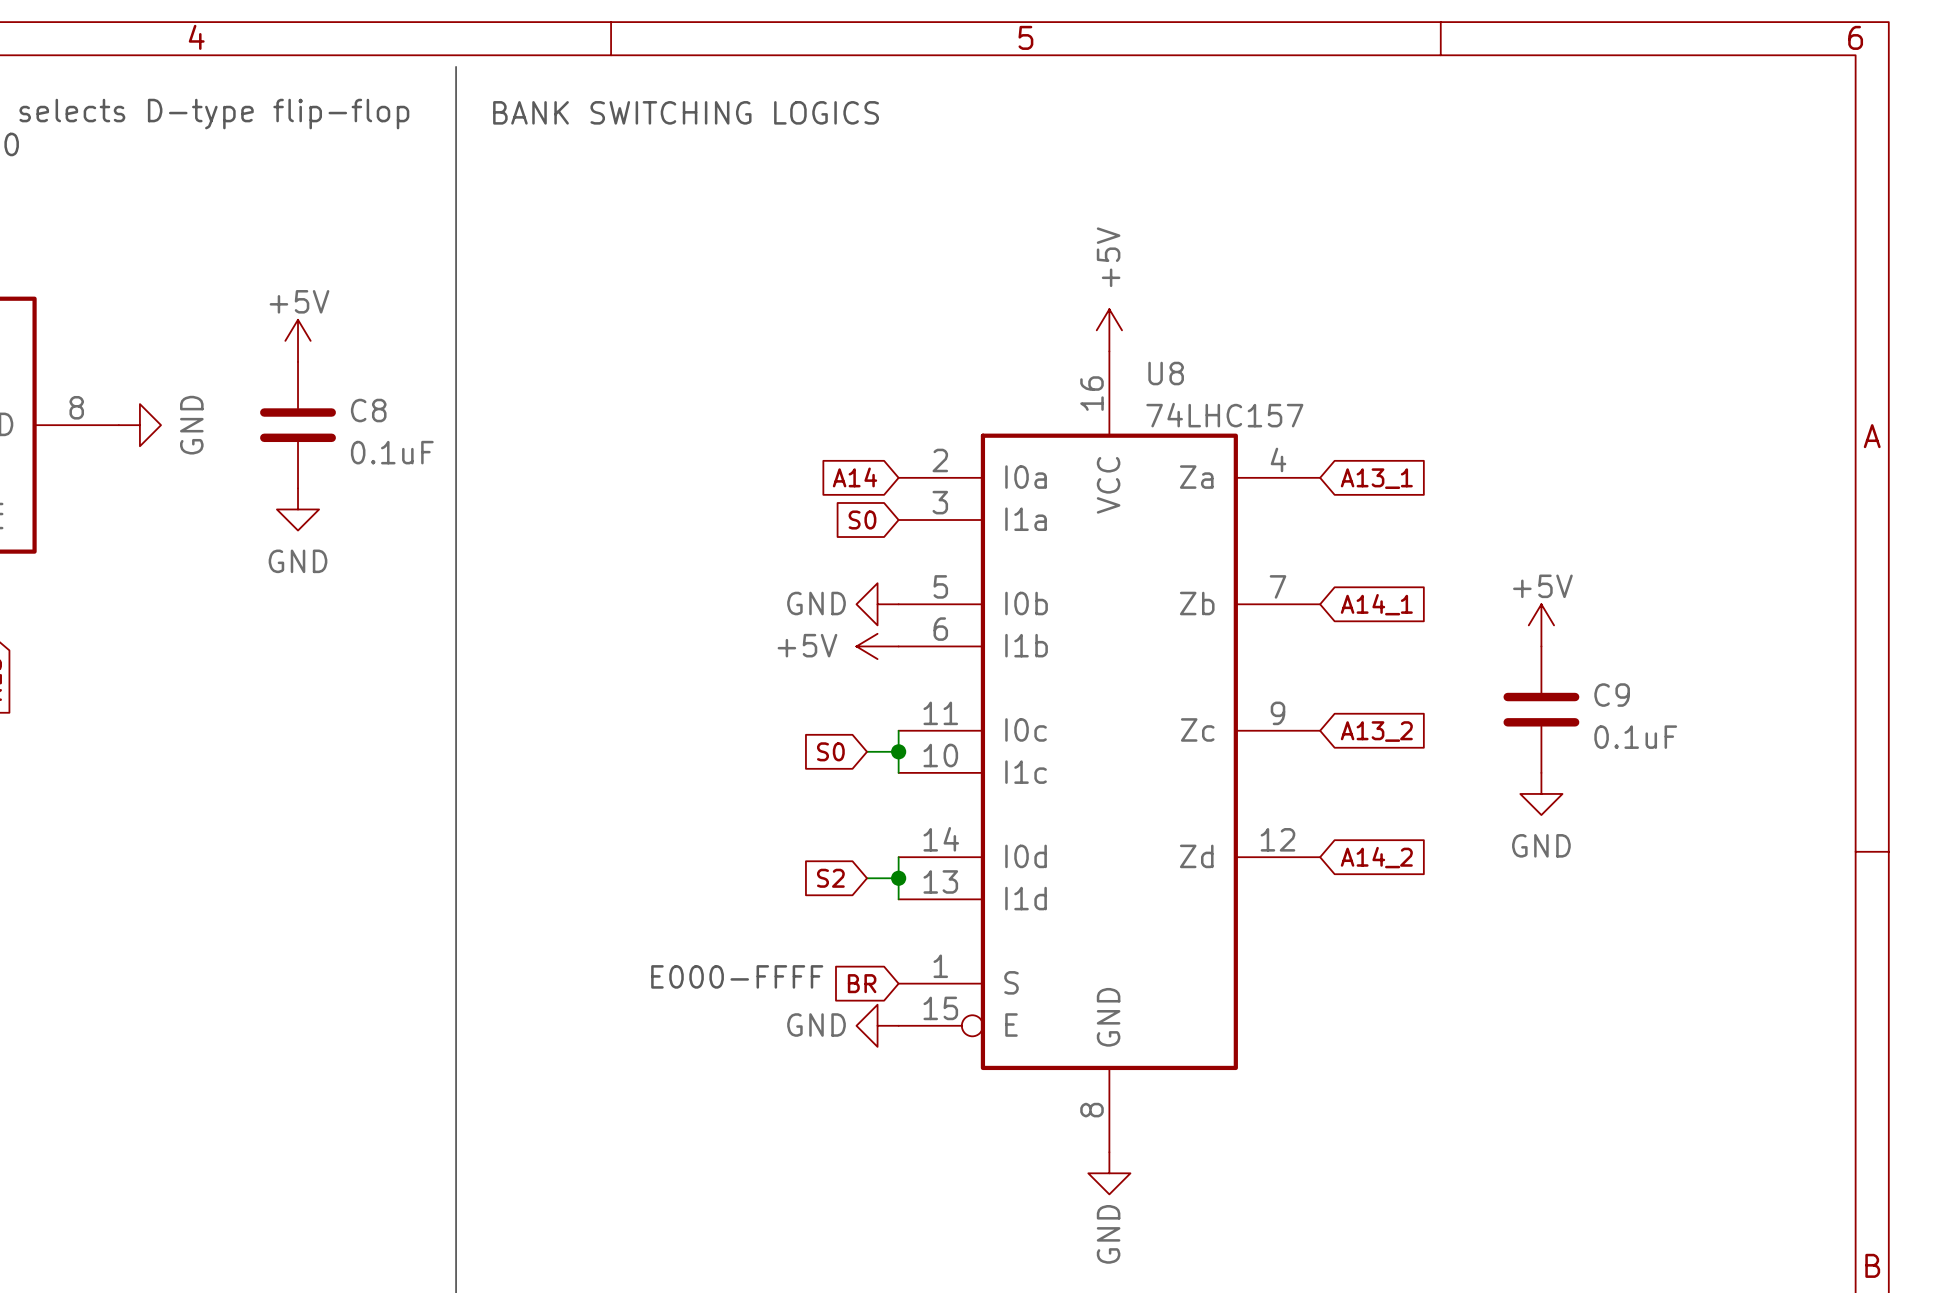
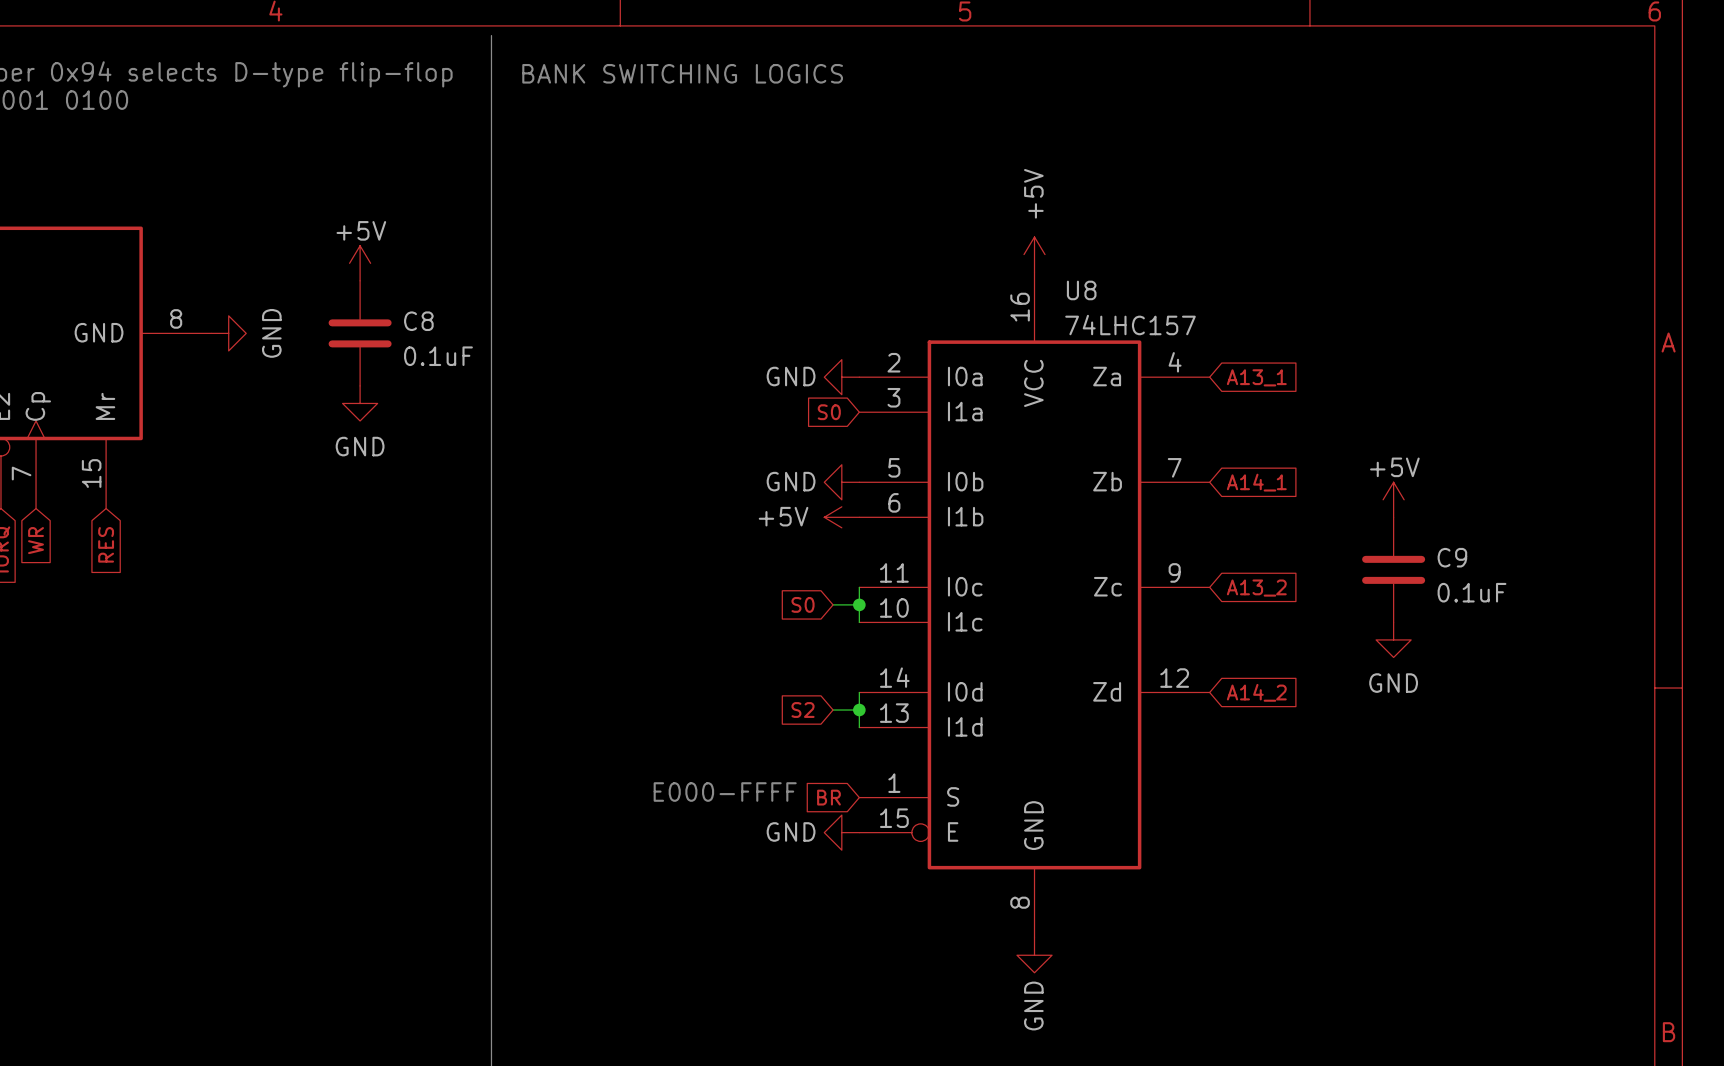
global label: A14 (854, 477) -> none
power symbol: none -> GND (841, 377)

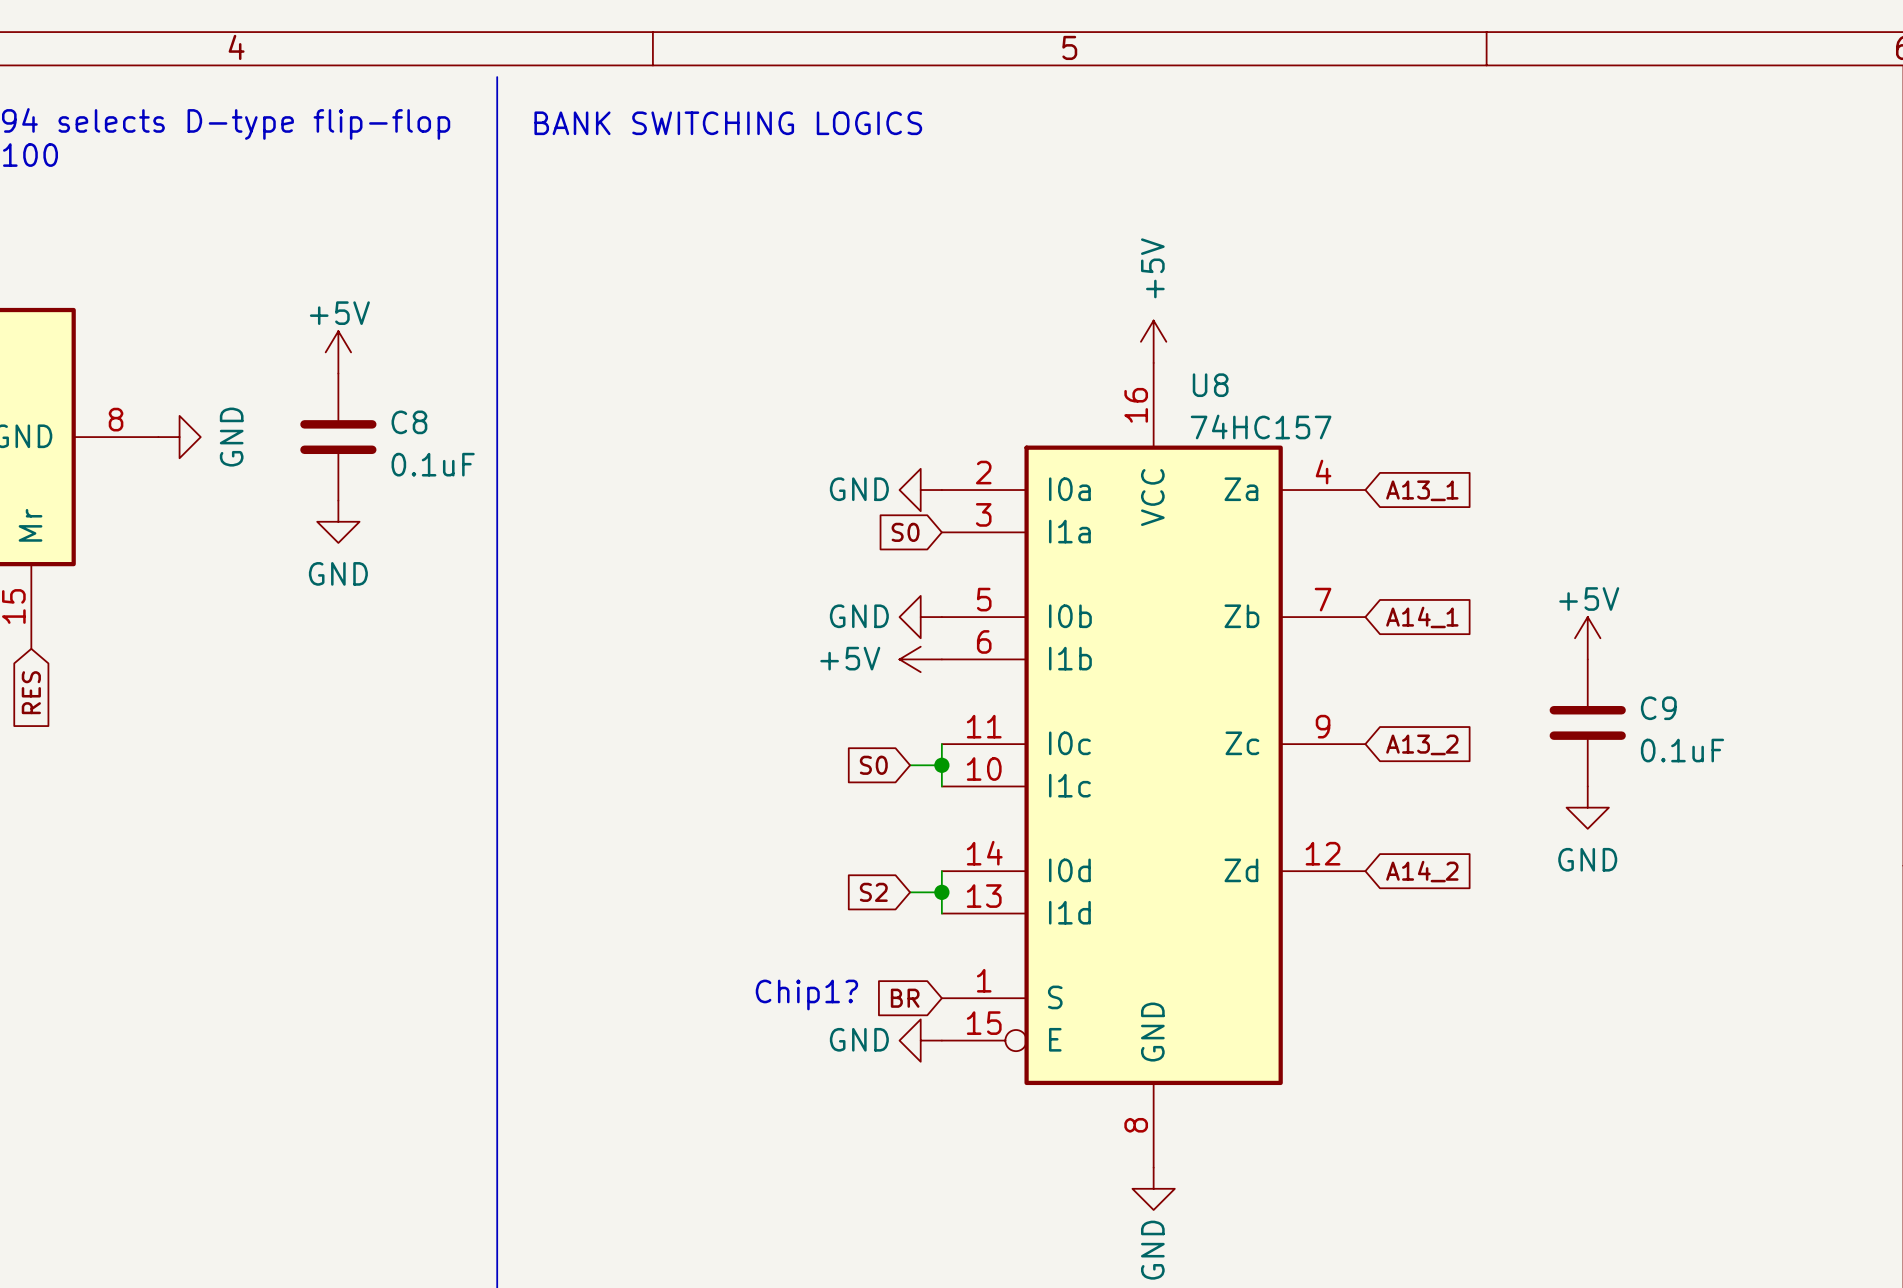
U8 value: 74LHC157 (1130, 325) -> 74HC157 (1261, 426)
text: E000-FFFF (725, 792) -> none
text: none -> Chip1? (806, 994)

